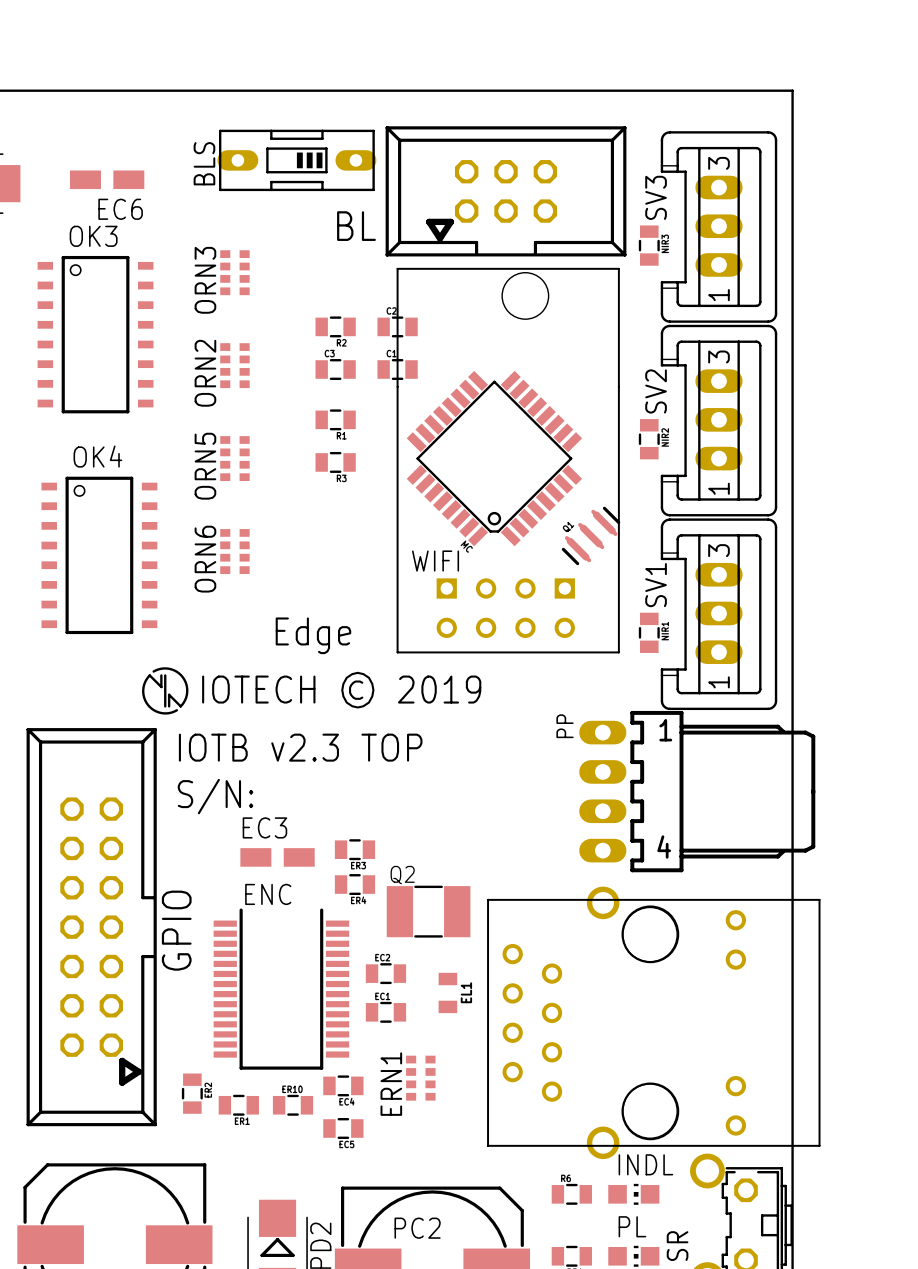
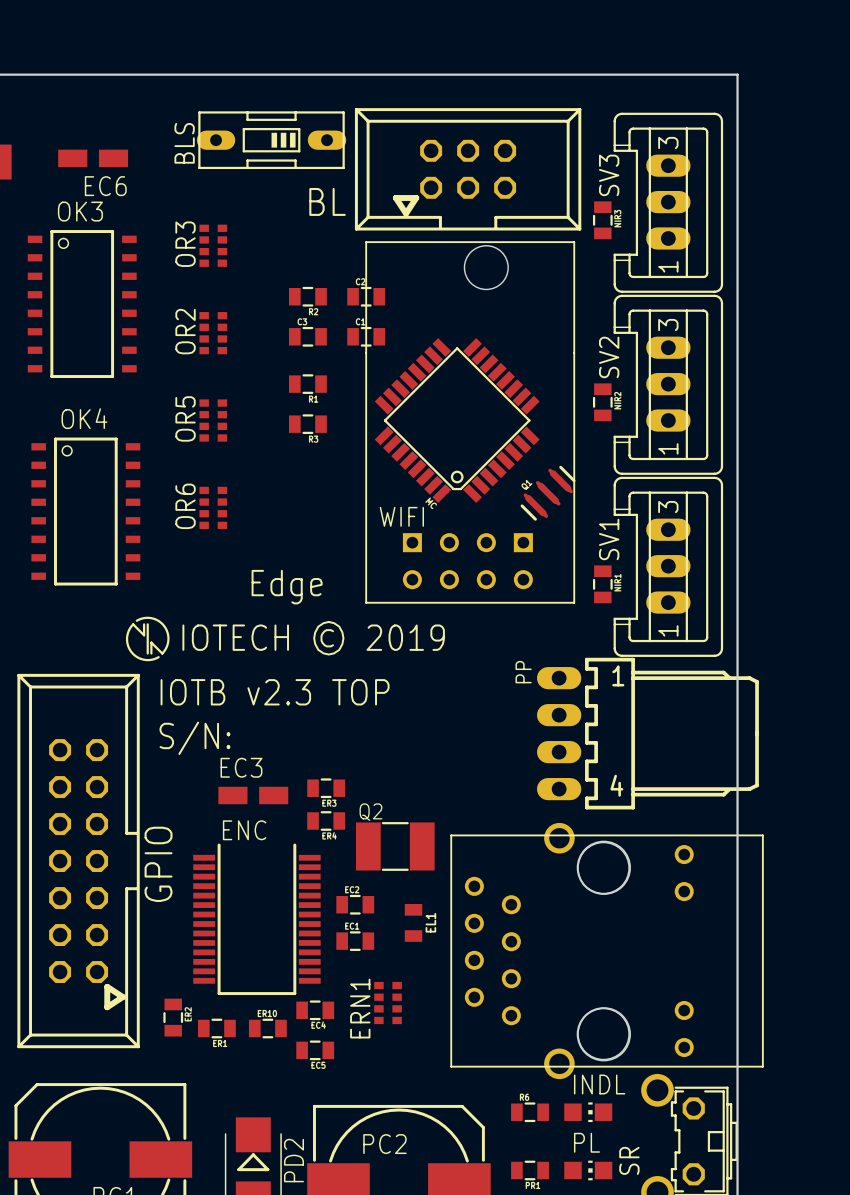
ORN3 name: ORN3 (205, 280) -> OR3 (185, 244)
ORN2 name: ORN2 (205, 373) -> OR2 (185, 331)
ORN5 name: ORN5 (205, 466) -> OR5 (185, 418)
ORN6 name: ORN6 (205, 559) -> OR6 (185, 506)

